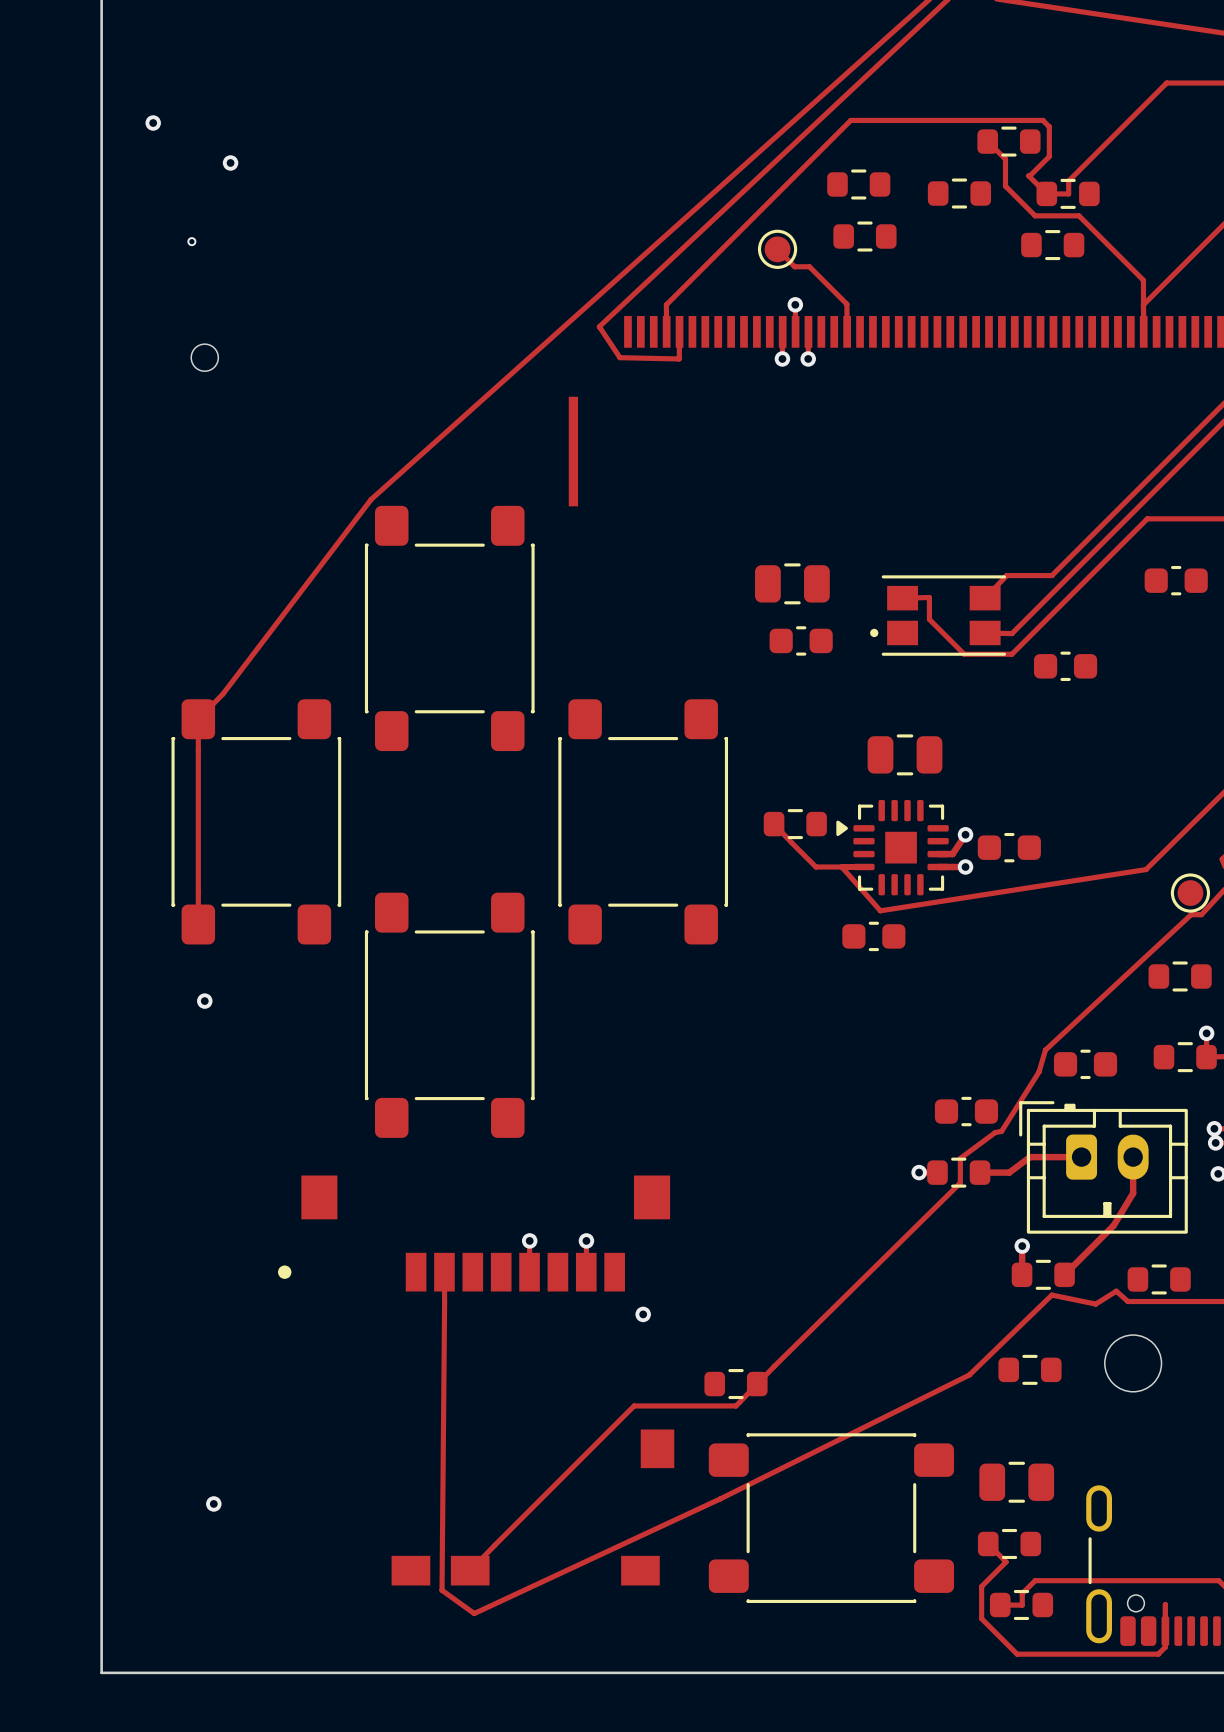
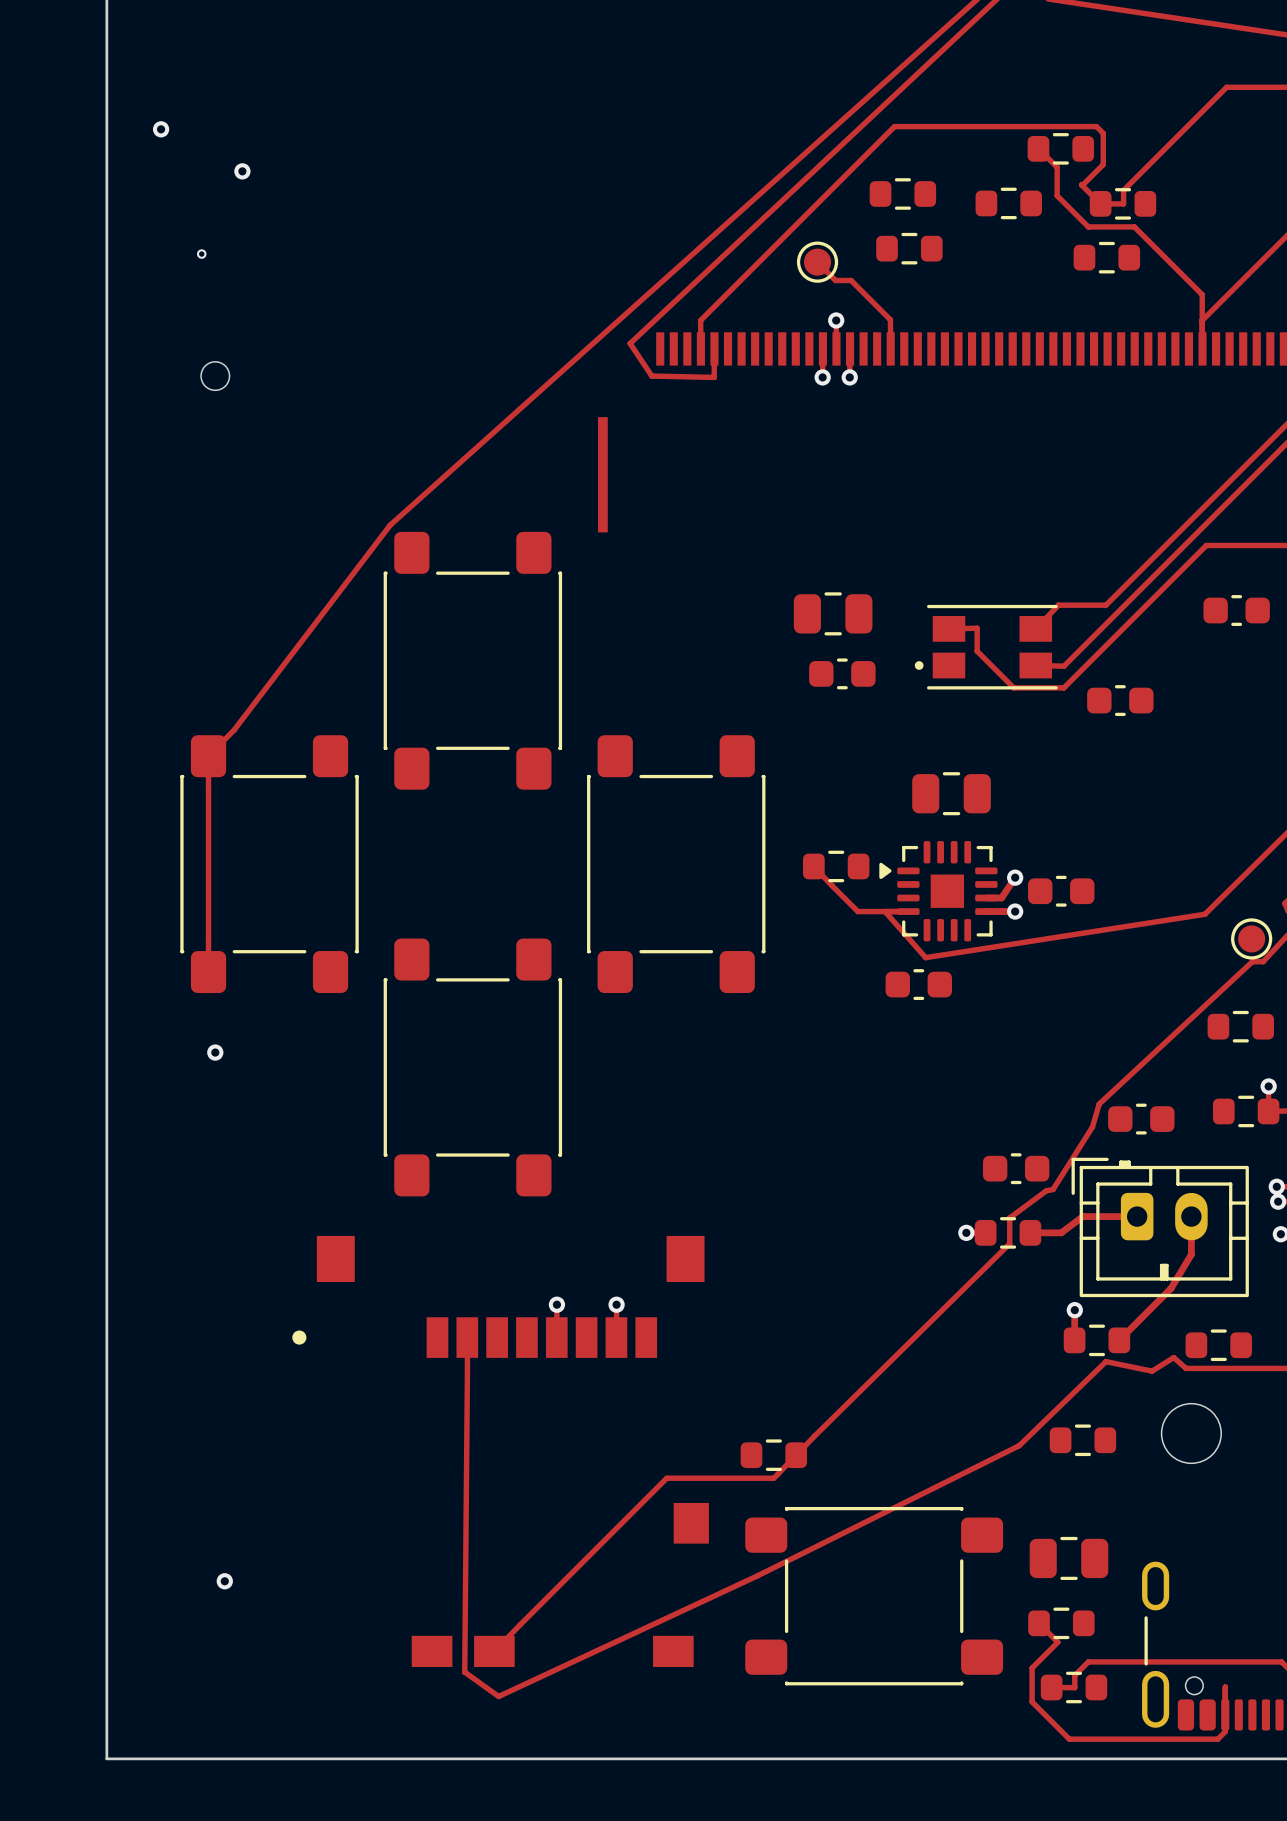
via: (643, 1314) -> none

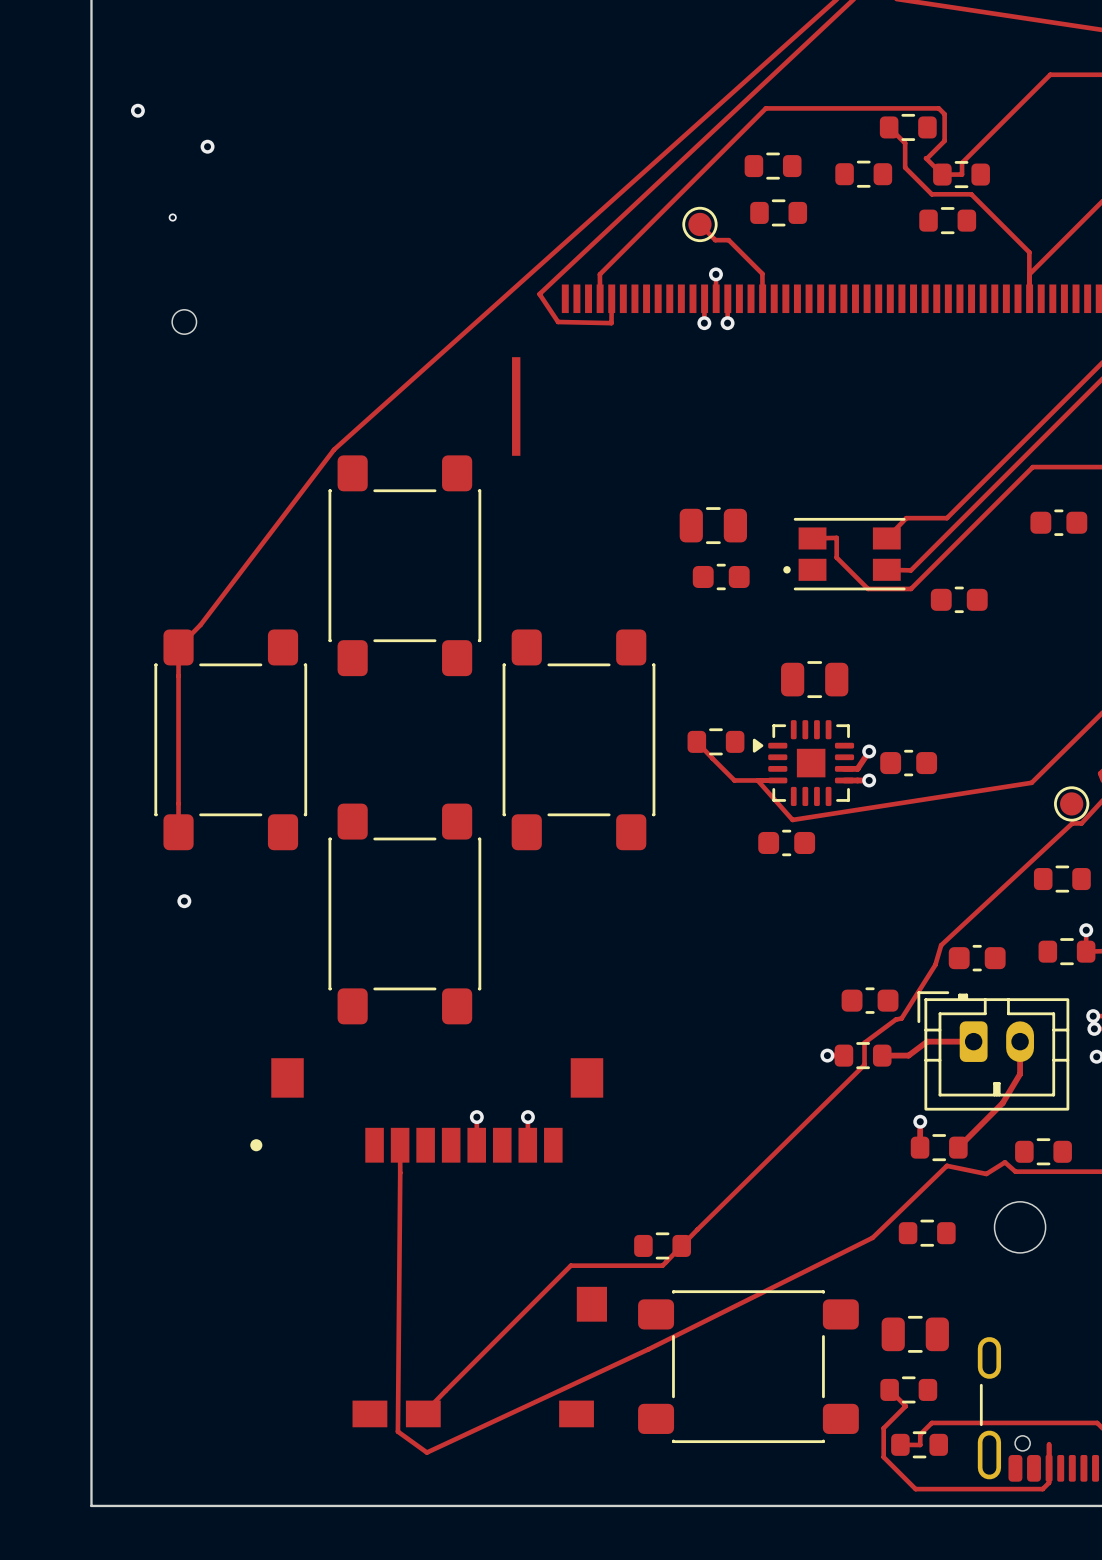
via: (224, 1581) -> none

